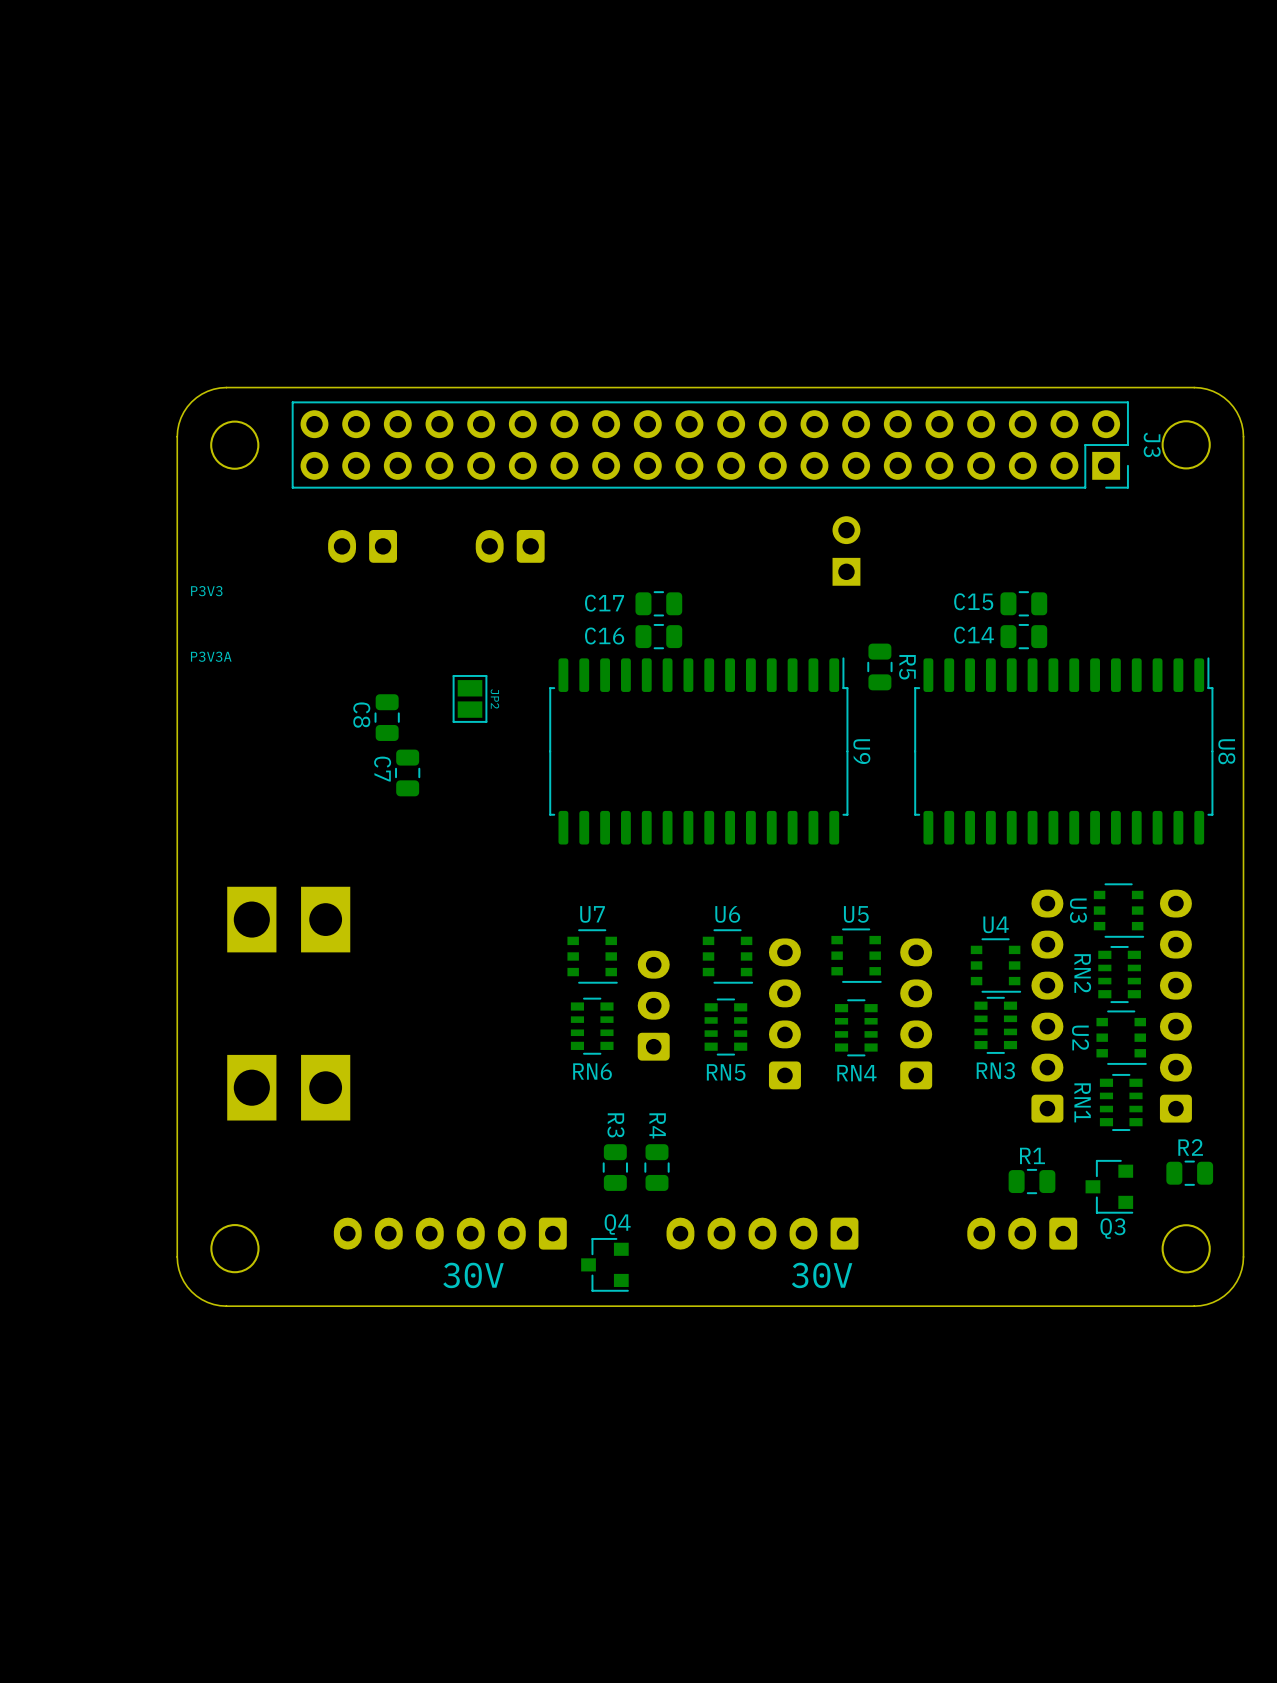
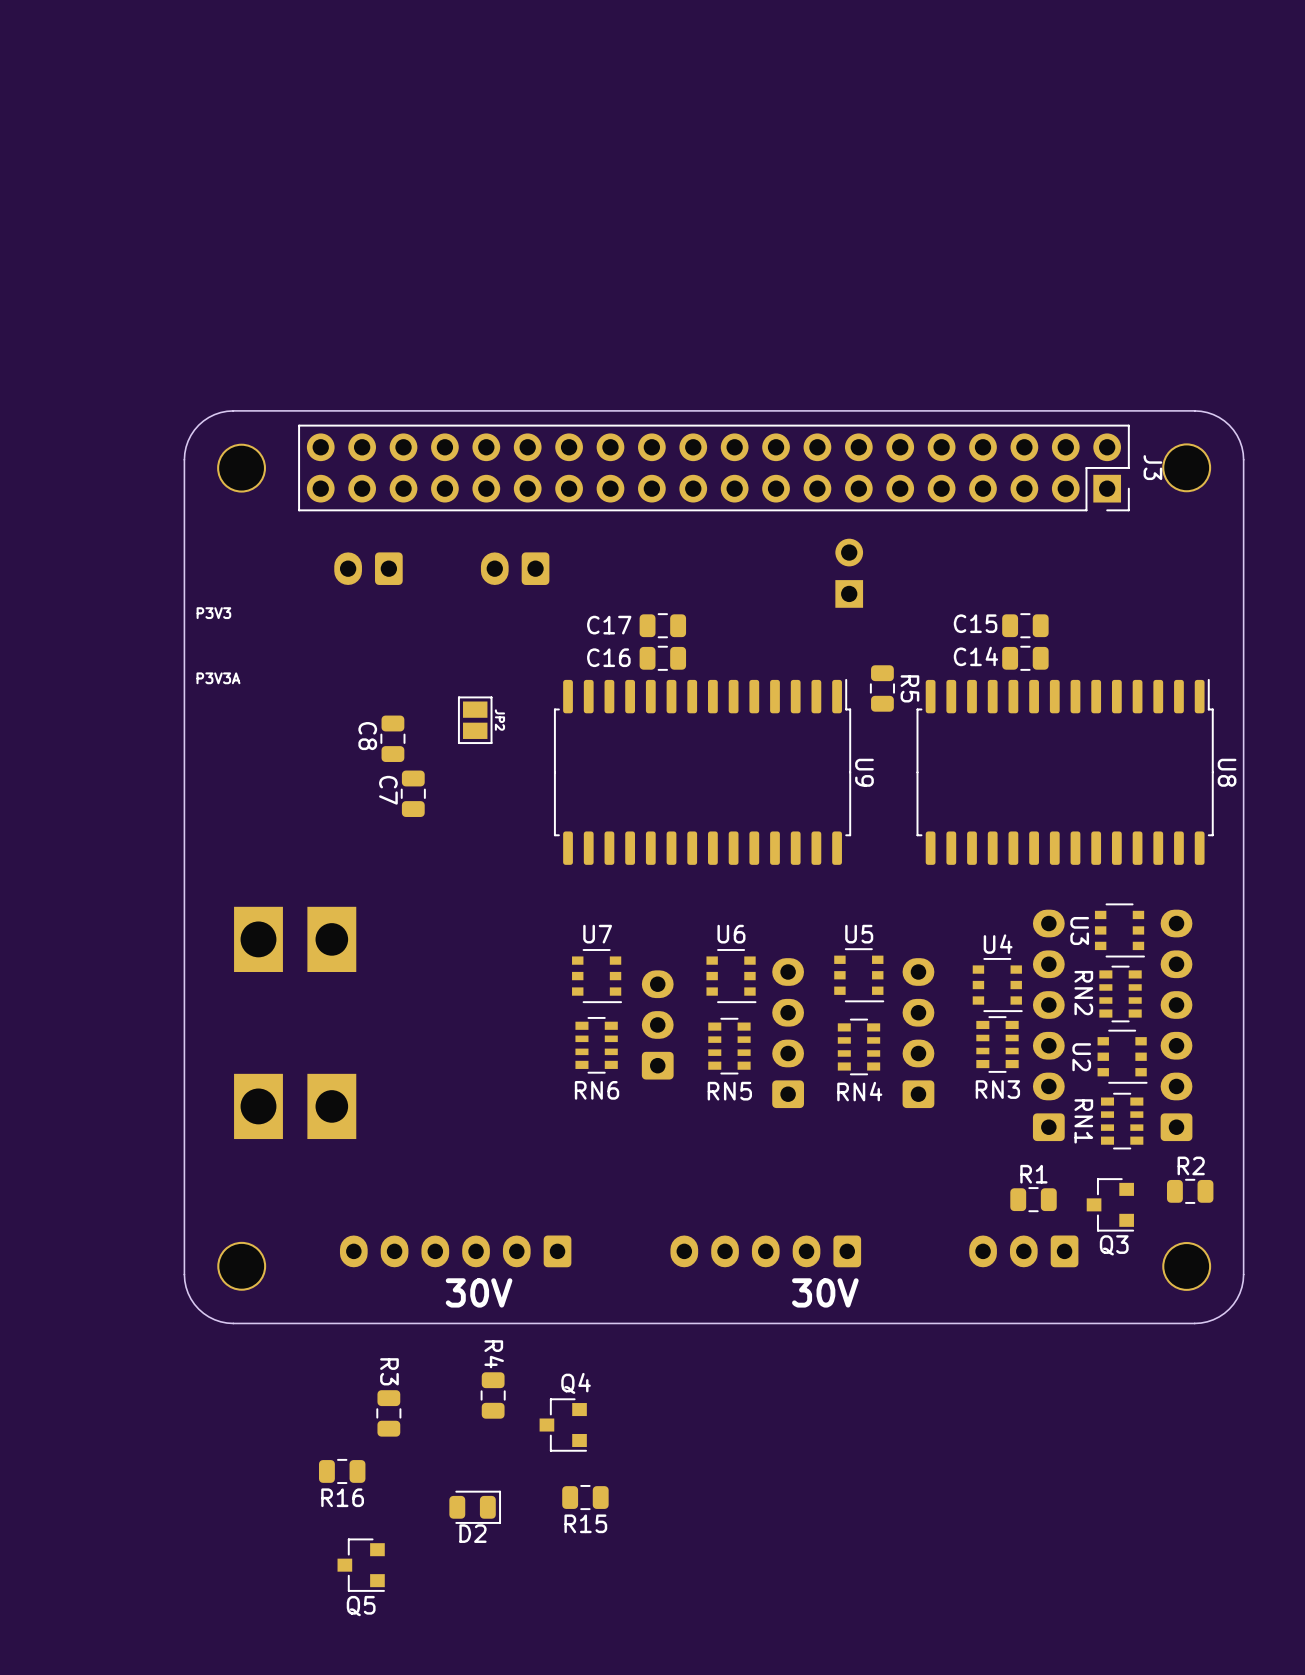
R3 position: (615, 1167) -> (388, 1413)
R4 position: (657, 1167) -> (493, 1395)
Q4 position: (605, 1264) -> (563, 1425)
R16: none -> (342, 1471)
R15: none -> (585, 1497)
D2: none -> (475, 1507)
Q5: none -> (361, 1565)

